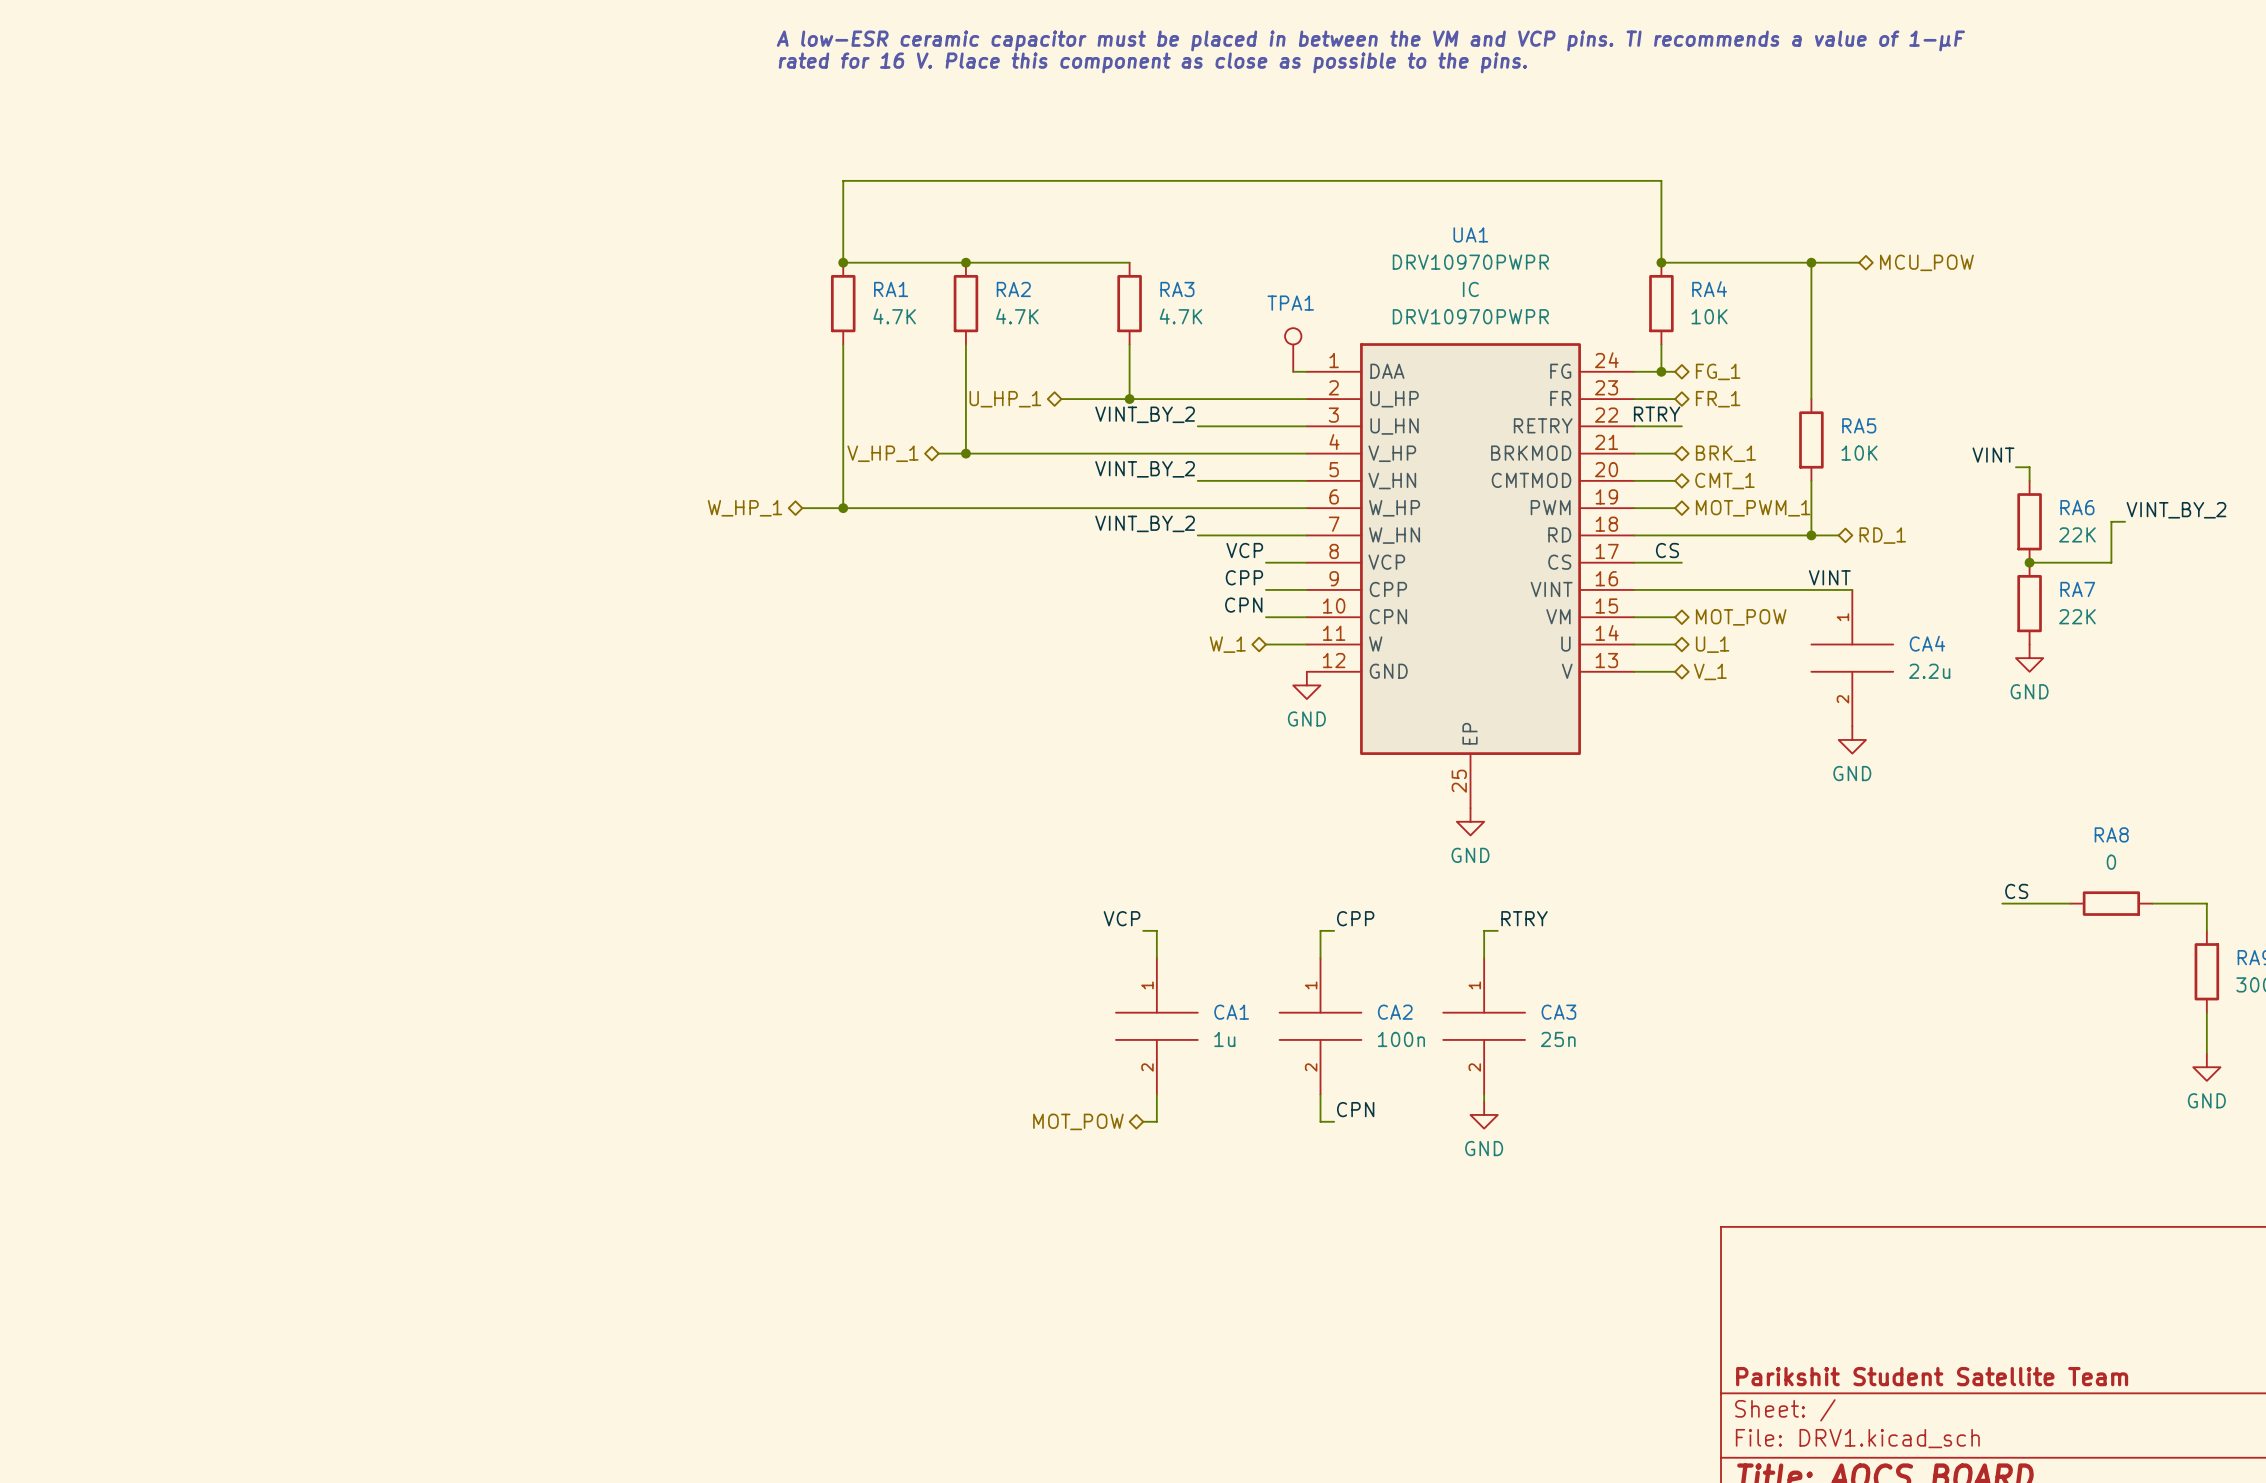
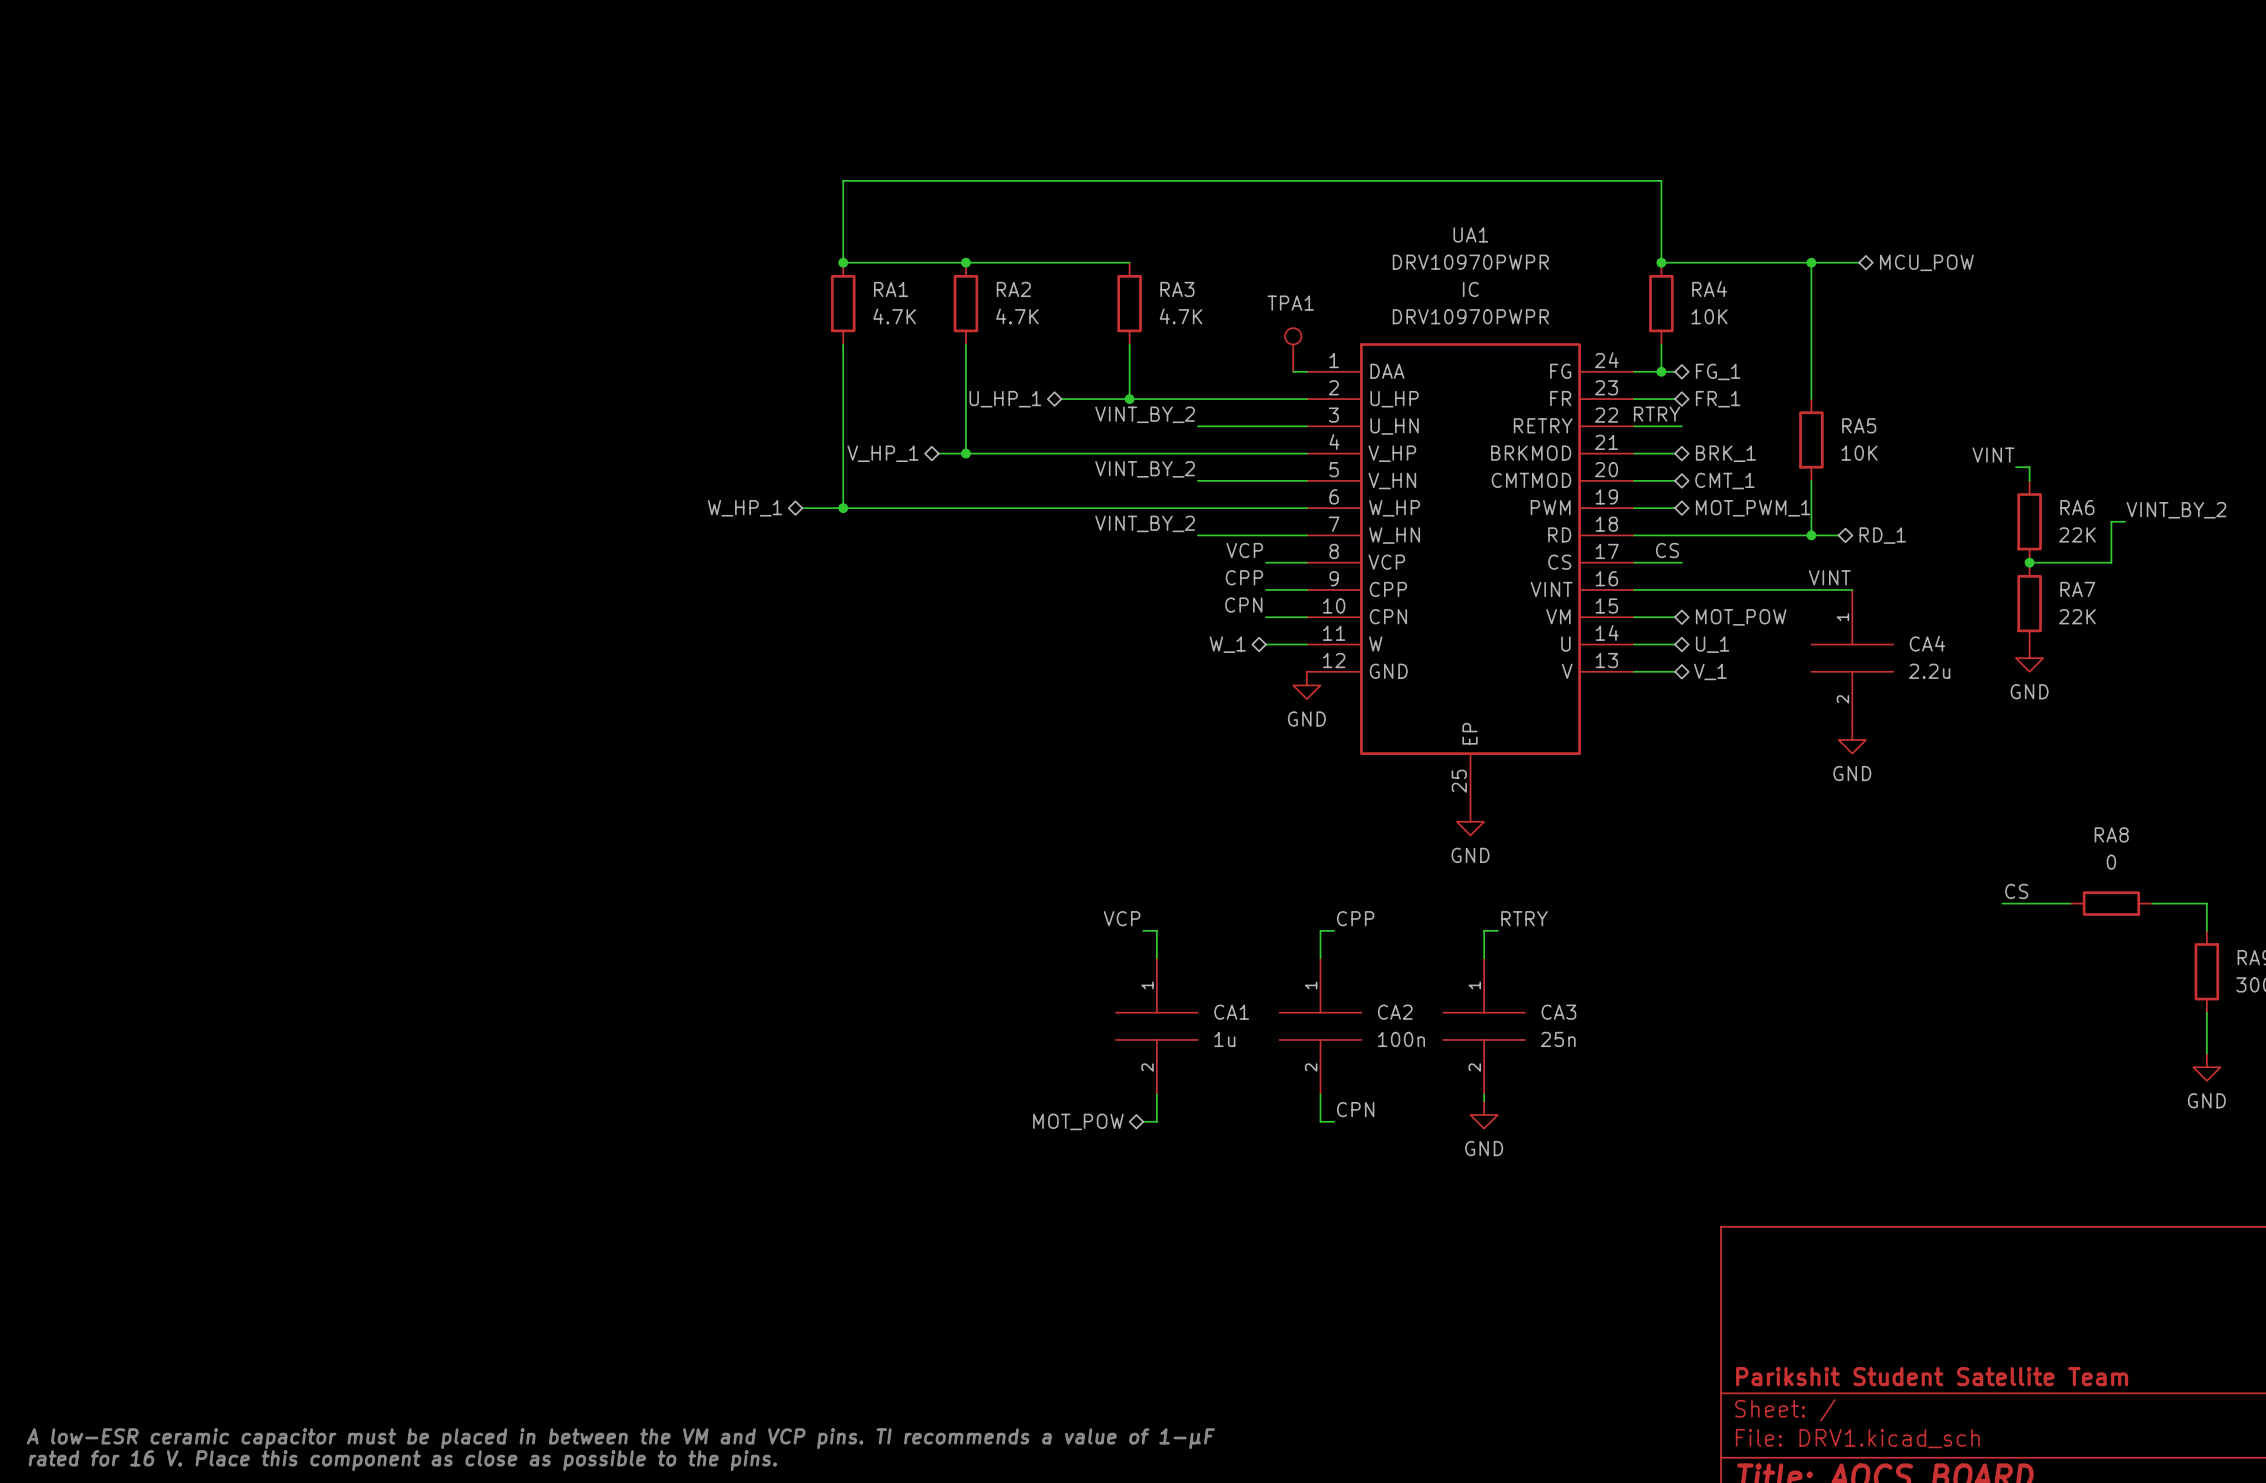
text: A low-ESR ceramic capacitor must be placed in between the VM and VCP pins. TI recommends a value of 1-µF (1370, 40) -> none
text: rated for 16 V. Place this component as close as possible to the pins. (1152, 62) -> none
text: none -> A low-ESR ceramic capacitor must be placed in between the VM and VCP pins. TI recommends a value of 1-µF (620, 1438)
text: none -> rated for 16 V. Place this component as close as possible to the pins. (402, 1460)

